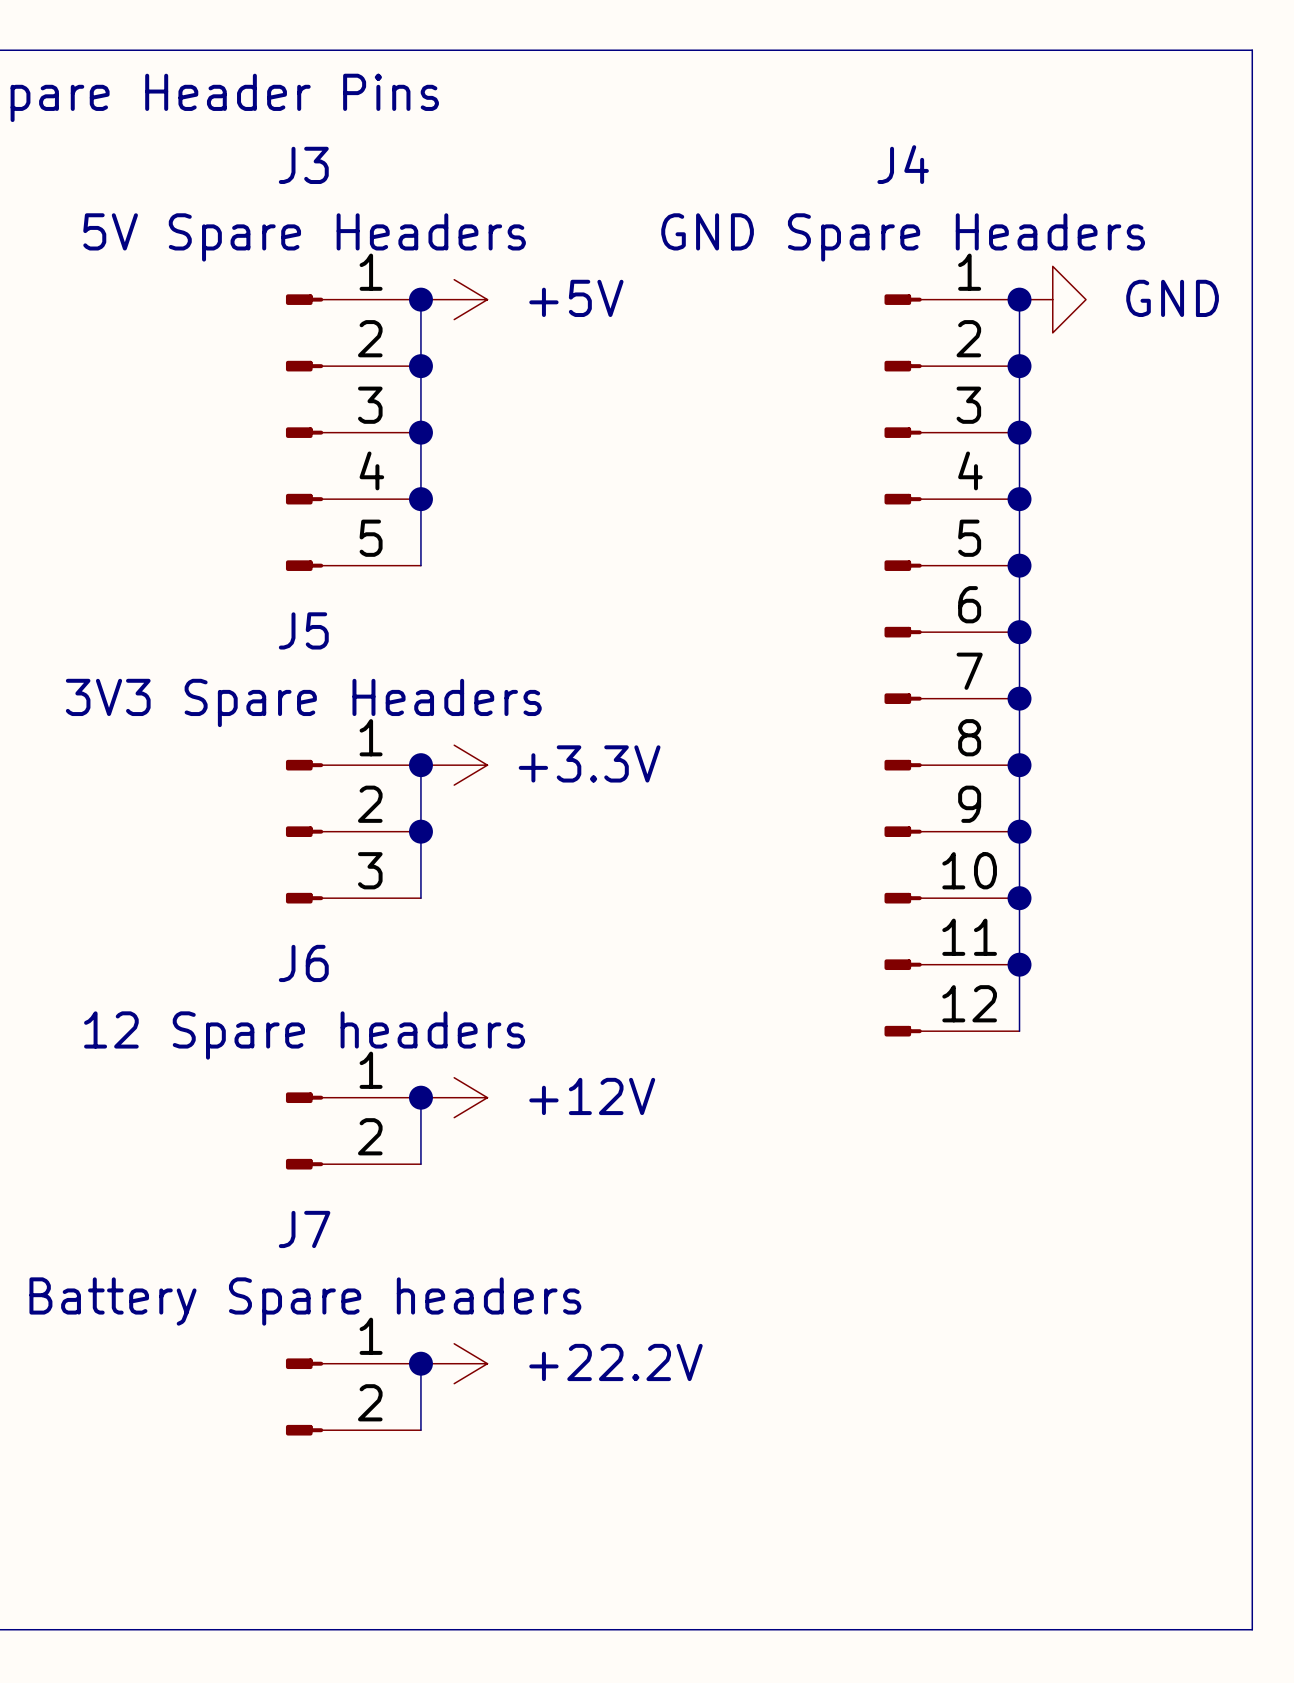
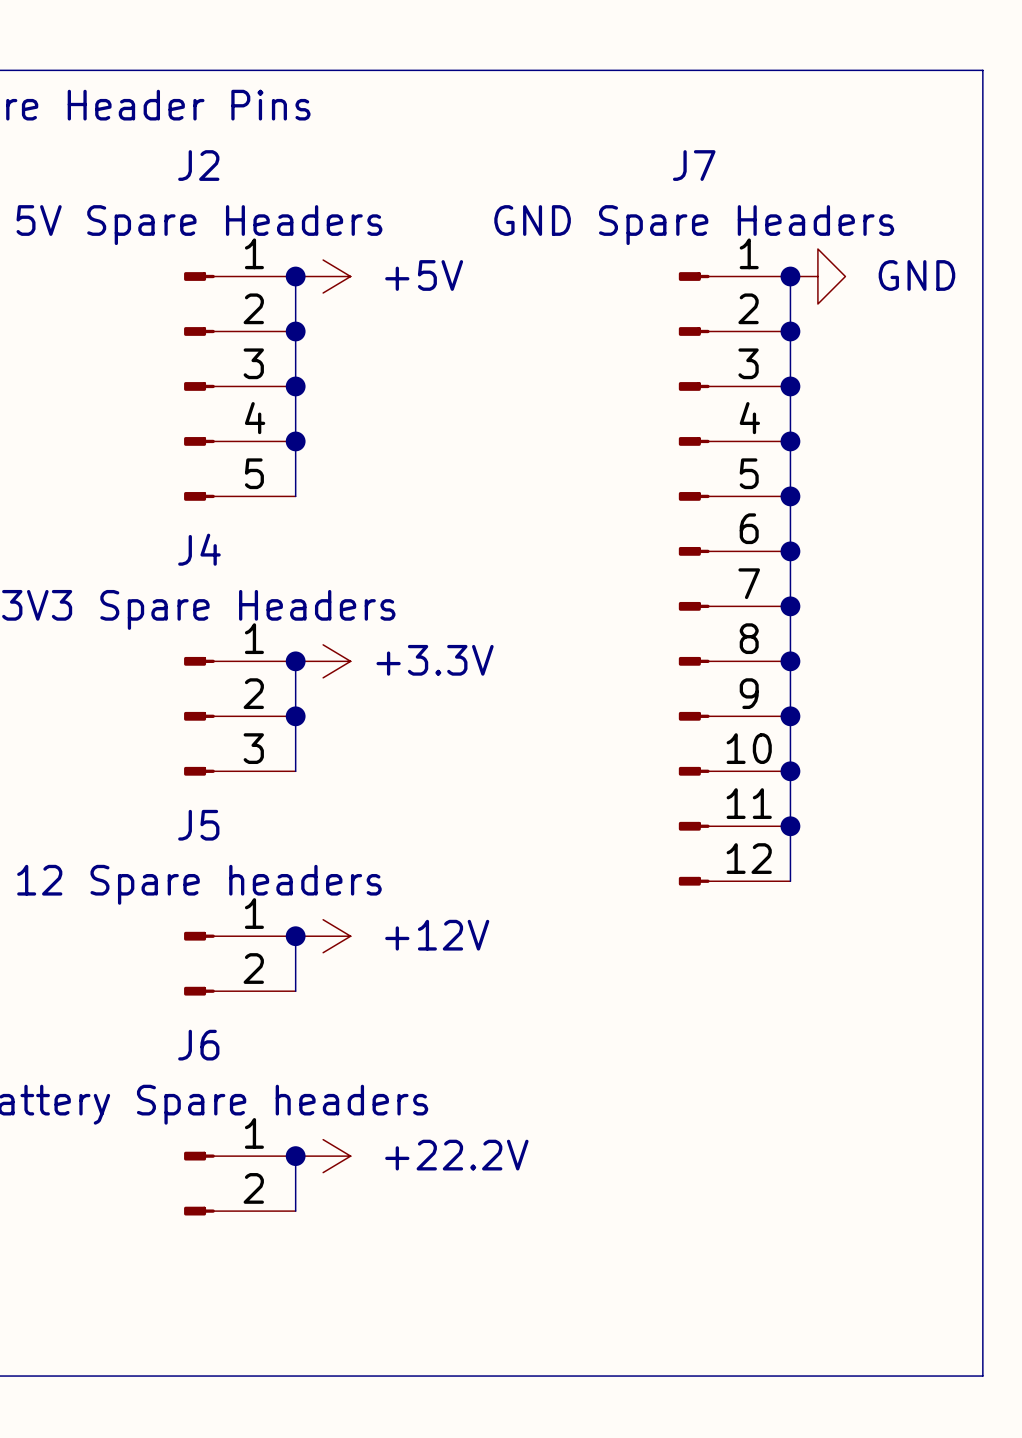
J4 name: J4 (903, 164) -> J7 (694, 165)
J3 name: J3 (303, 165) -> J2 (198, 165)
J5 name: J5 (303, 630) -> J4 (199, 549)
J6 name: J6 (303, 963) -> J5 (198, 825)
J7 name: J7 (304, 1229) -> J6 (198, 1045)

